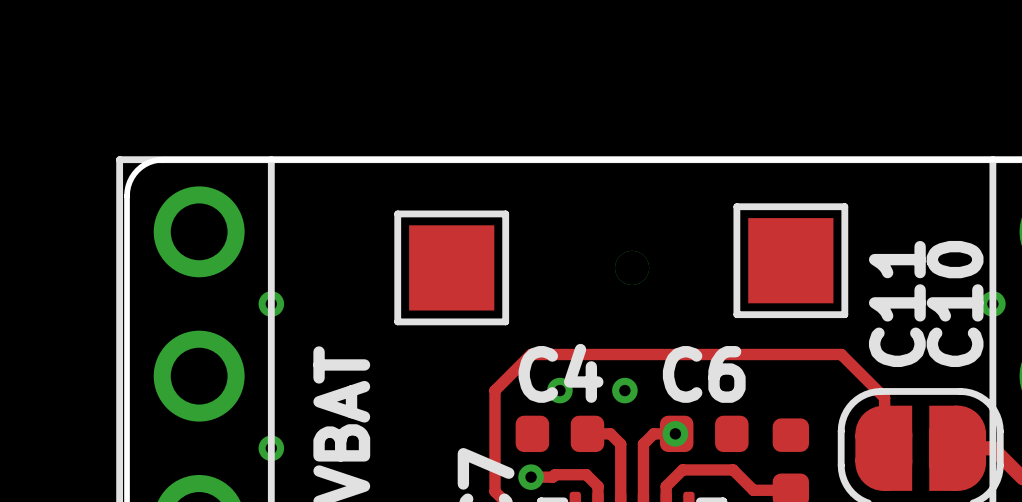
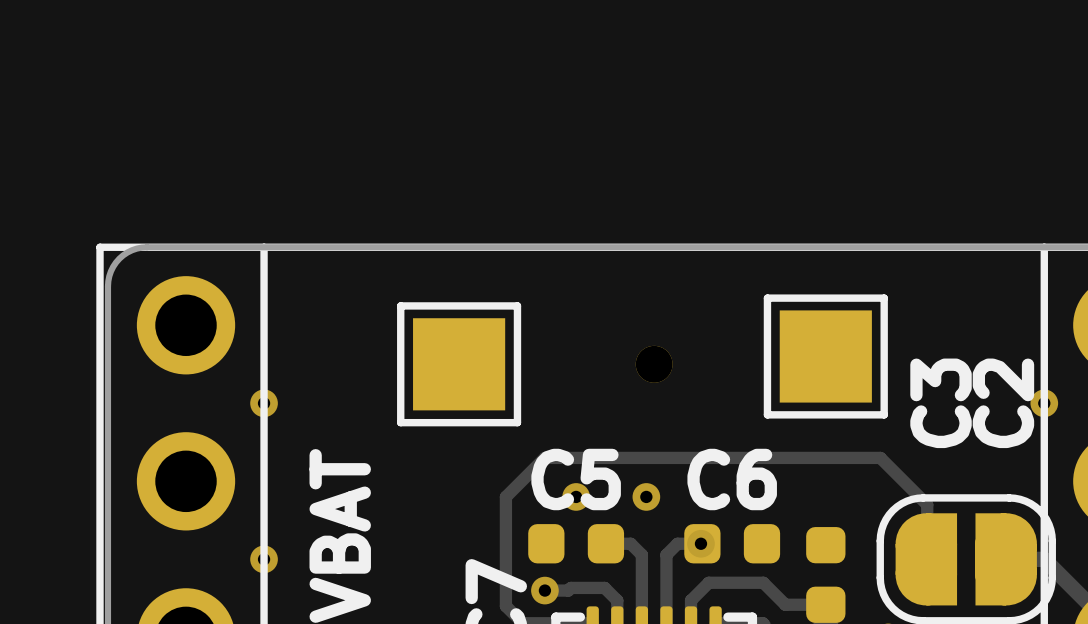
C11 name: C11 (897, 303) -> C3 (941, 403)
C10 name: C10 (955, 303) -> C2 (1003, 403)
C4 name: C4 (561, 373) -> C5 (576, 479)

